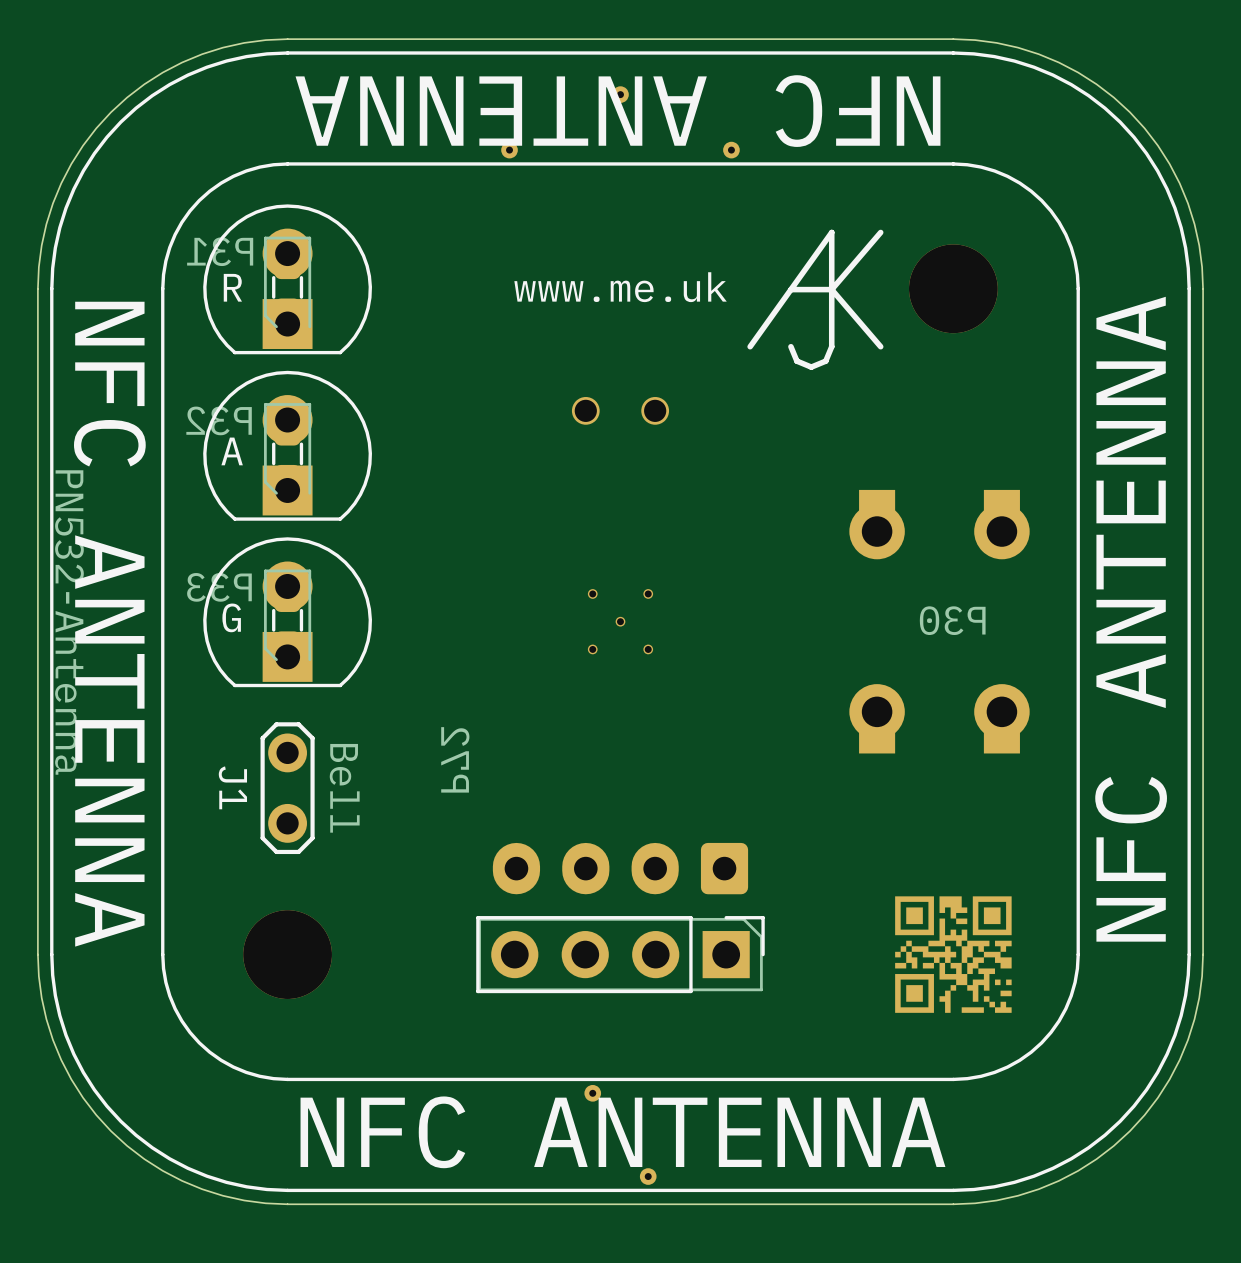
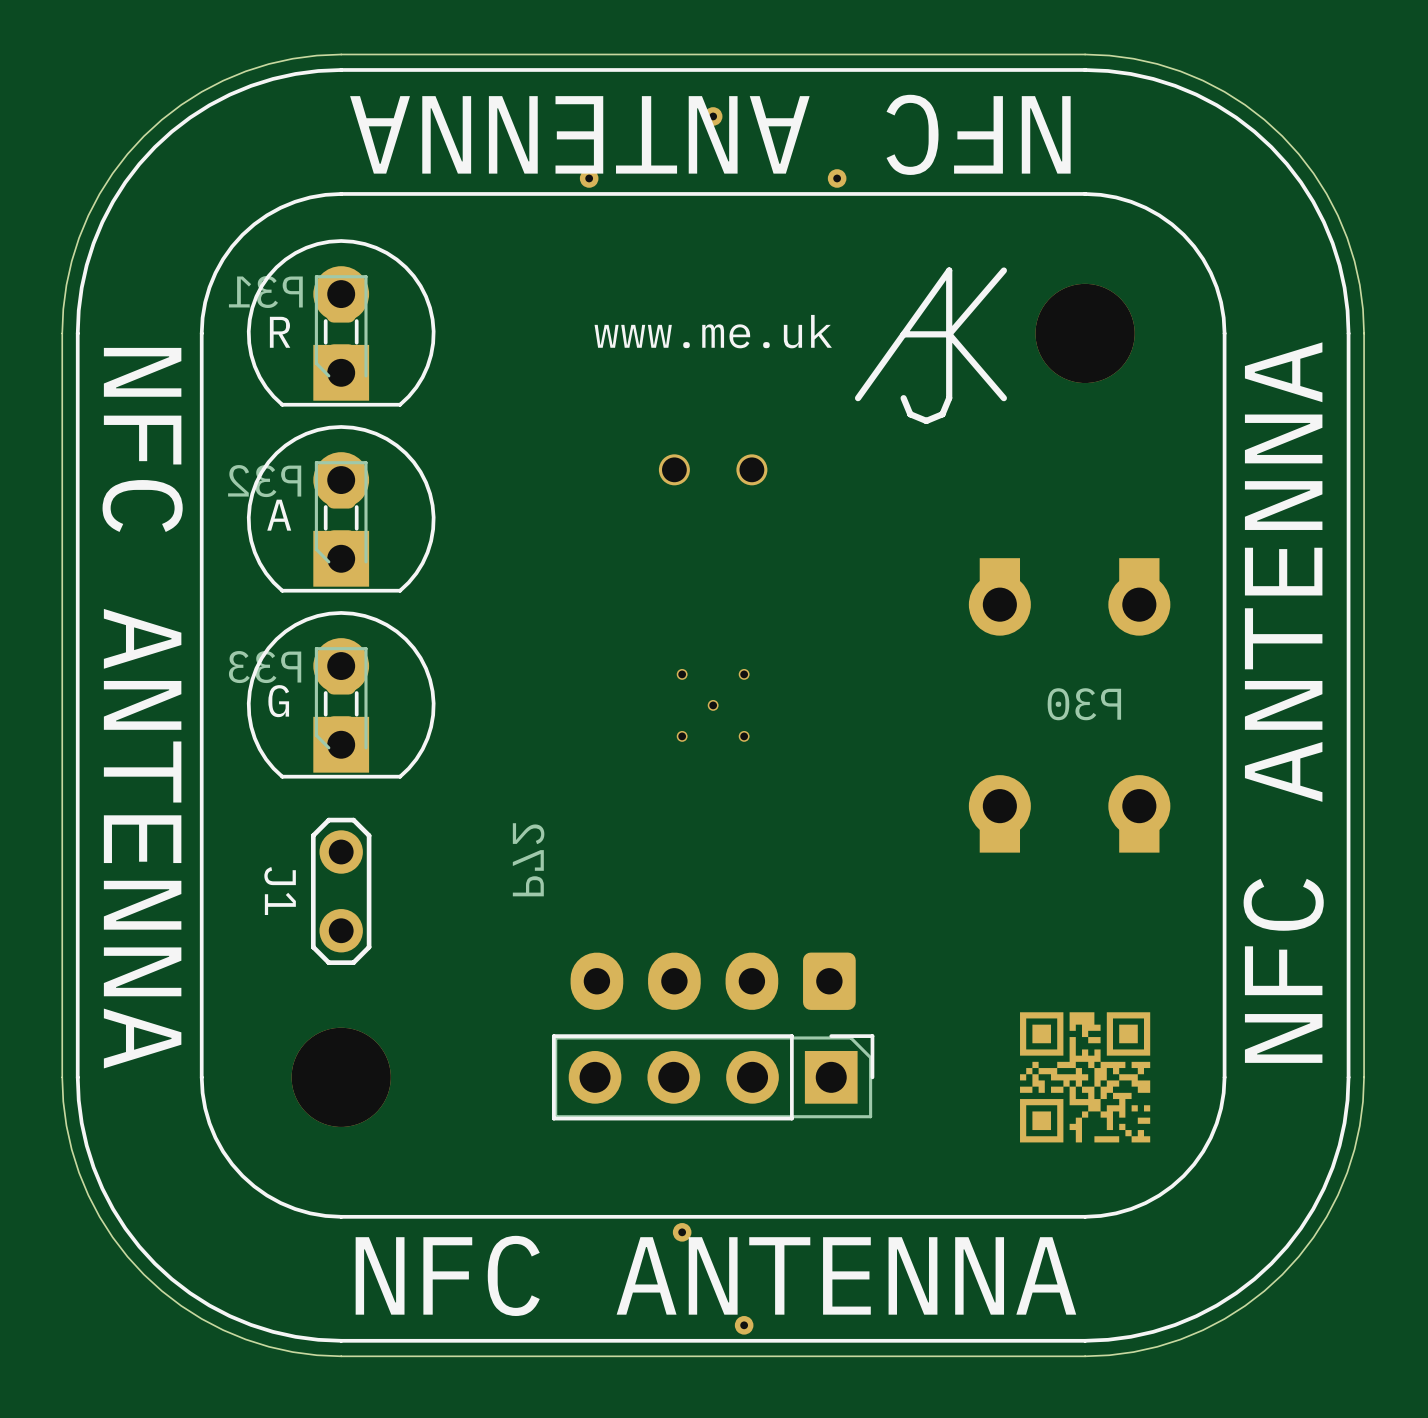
part value: PN532-Antenna (69, 622) -> none
J1 value: Bell (344, 788) -> none

